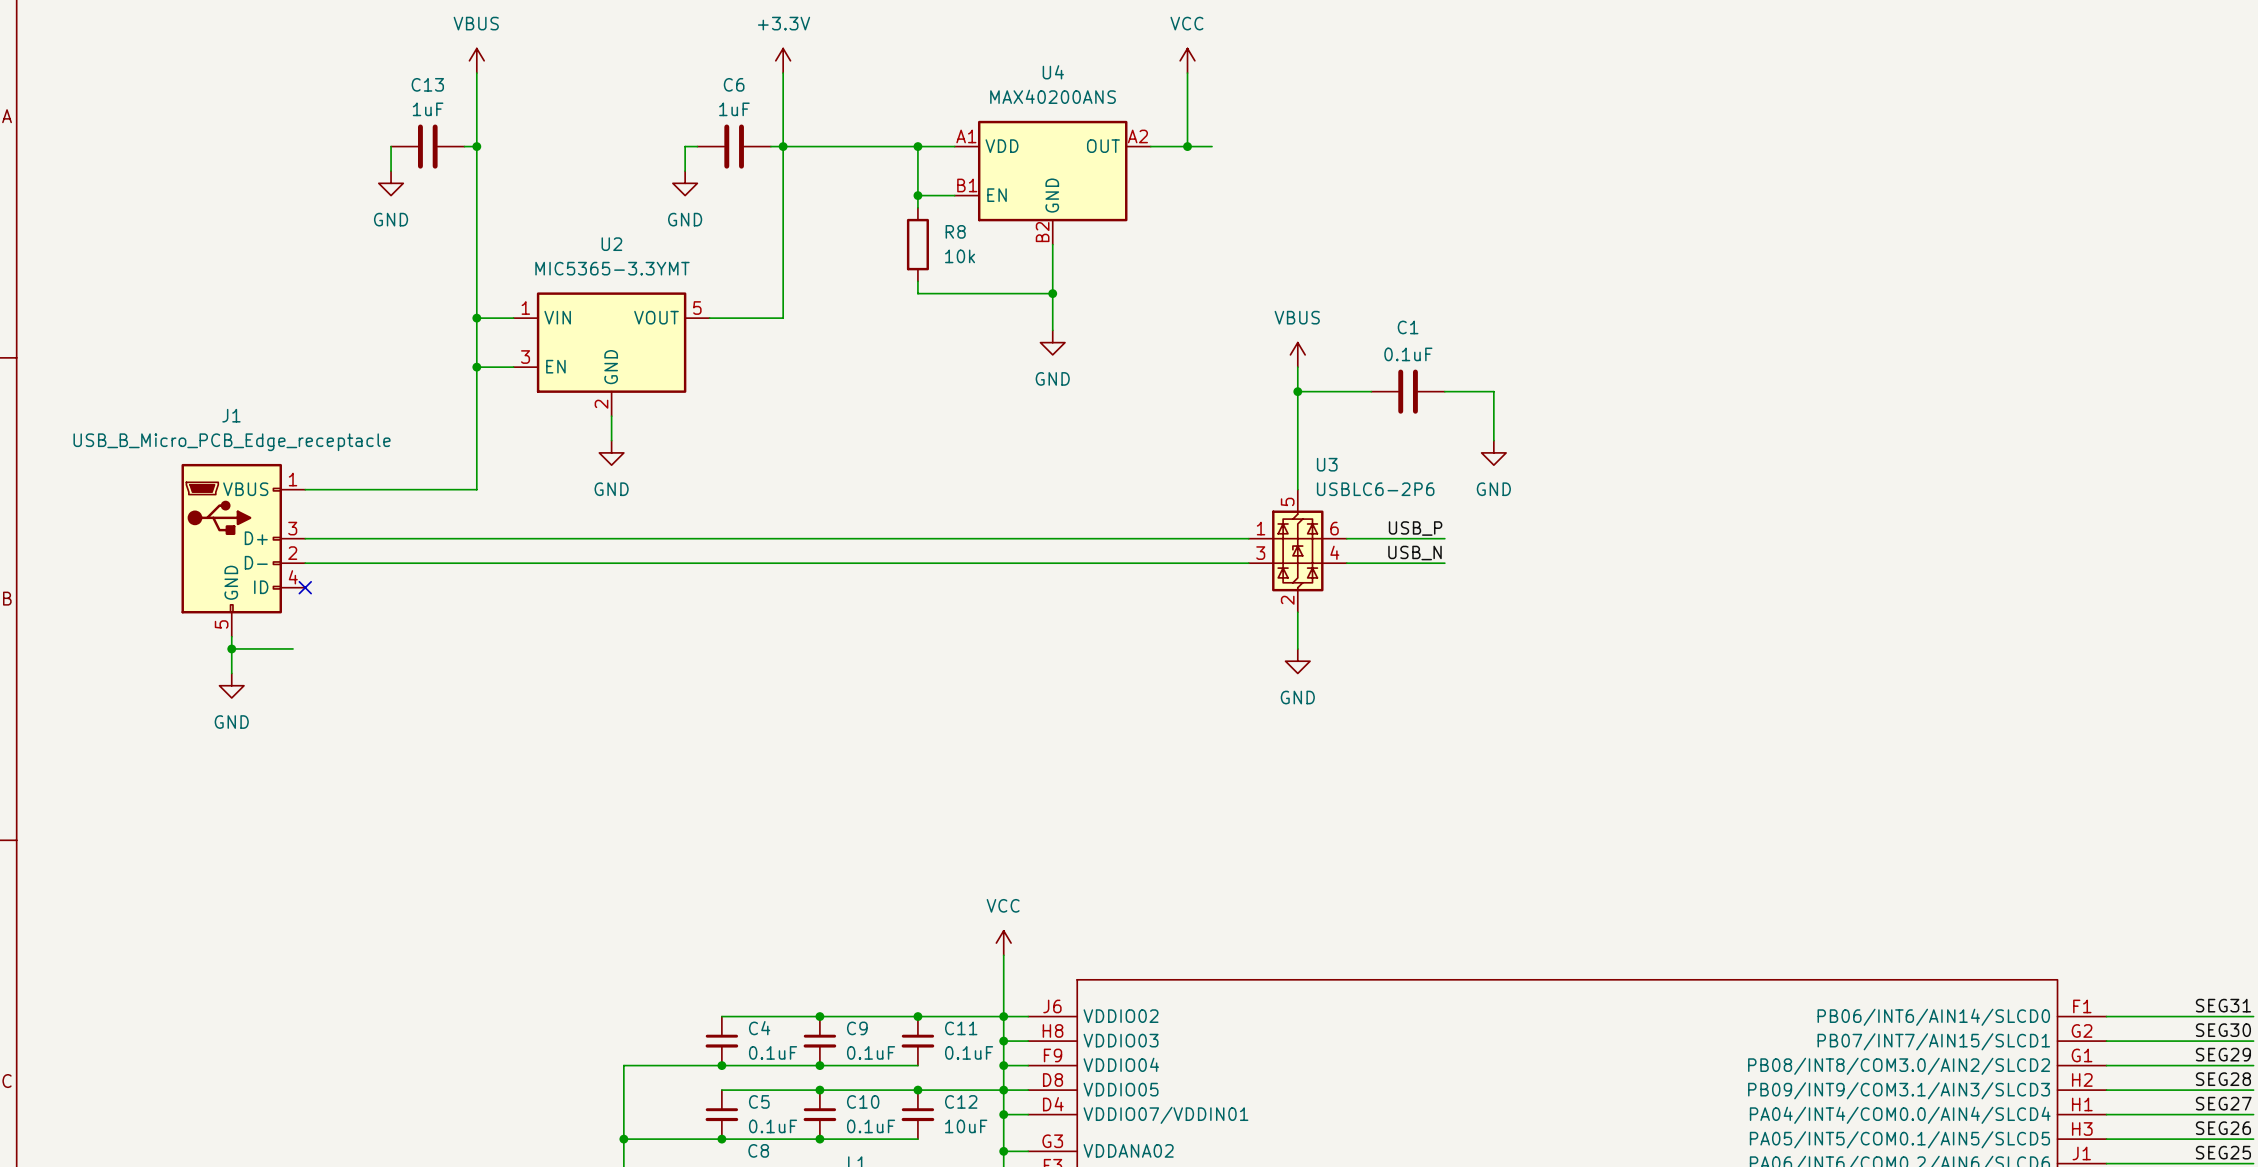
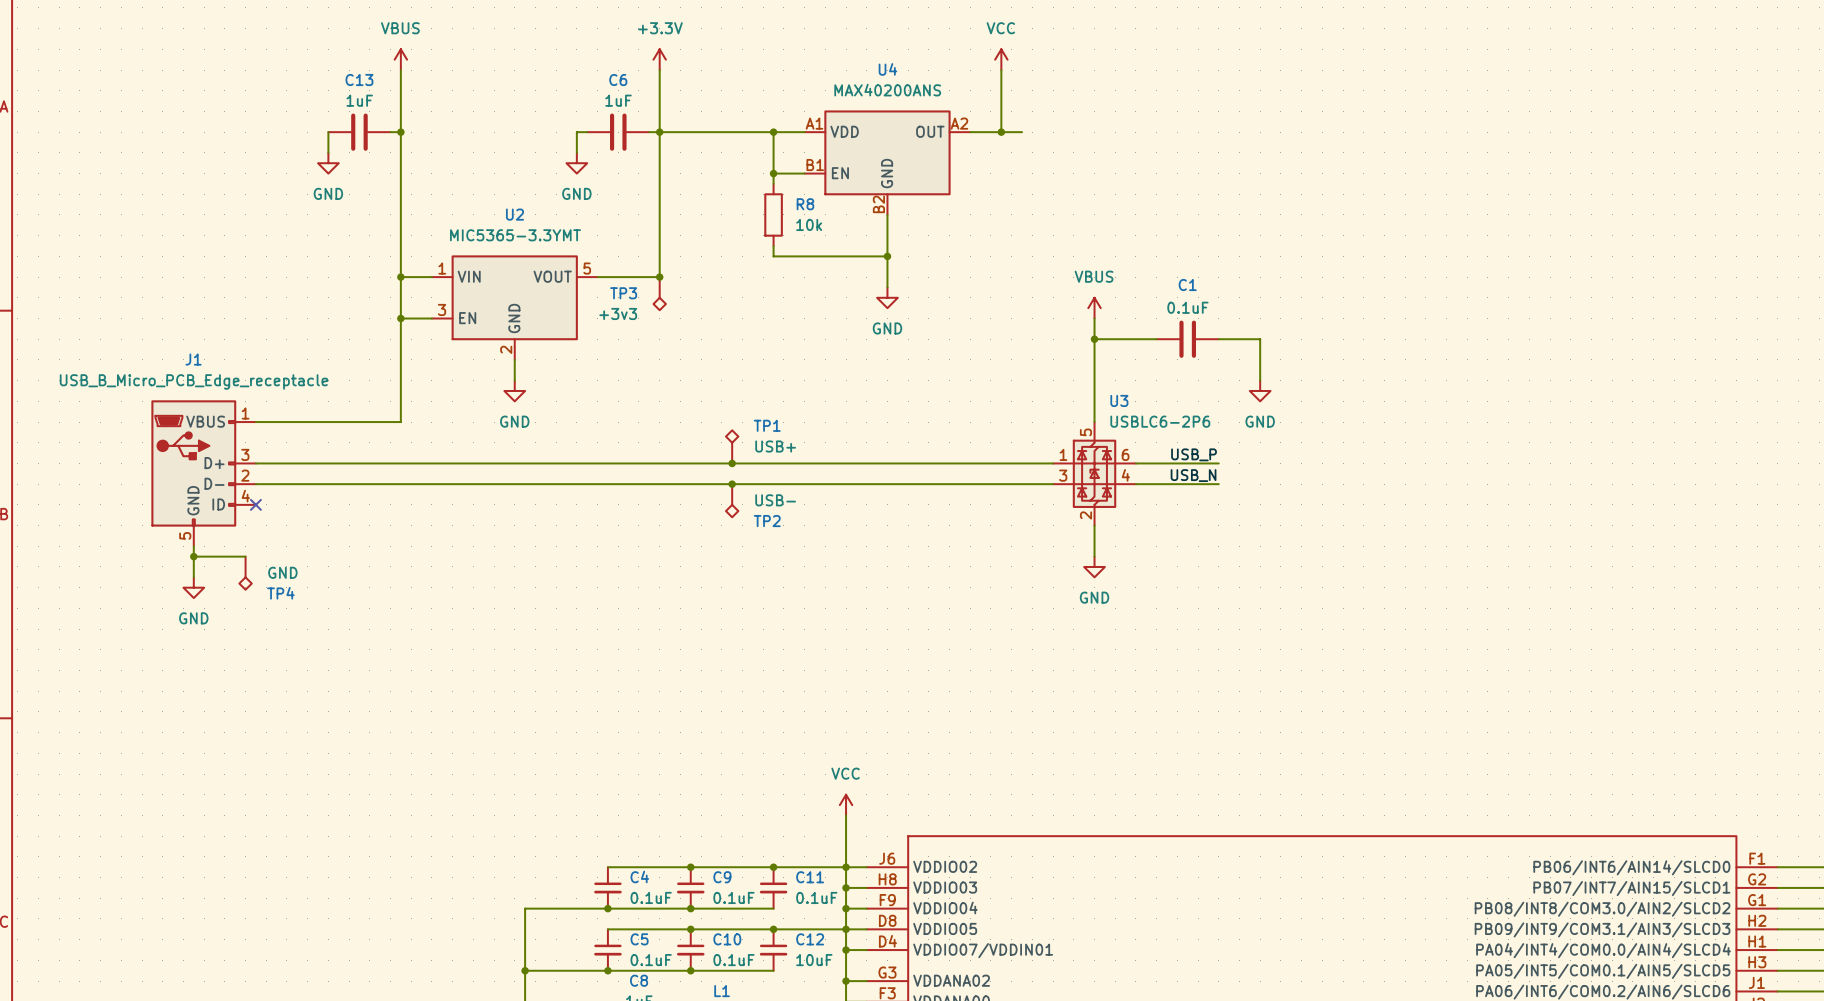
junction: none -> (659, 277)
TP3: none -> +3v3 (659, 293)
TP1: none -> USB+ (732, 446)
junction: none -> (732, 463)
junction: none -> (732, 484)
TP2: none -> USB- (732, 500)
TP4: none -> GND (245, 573)

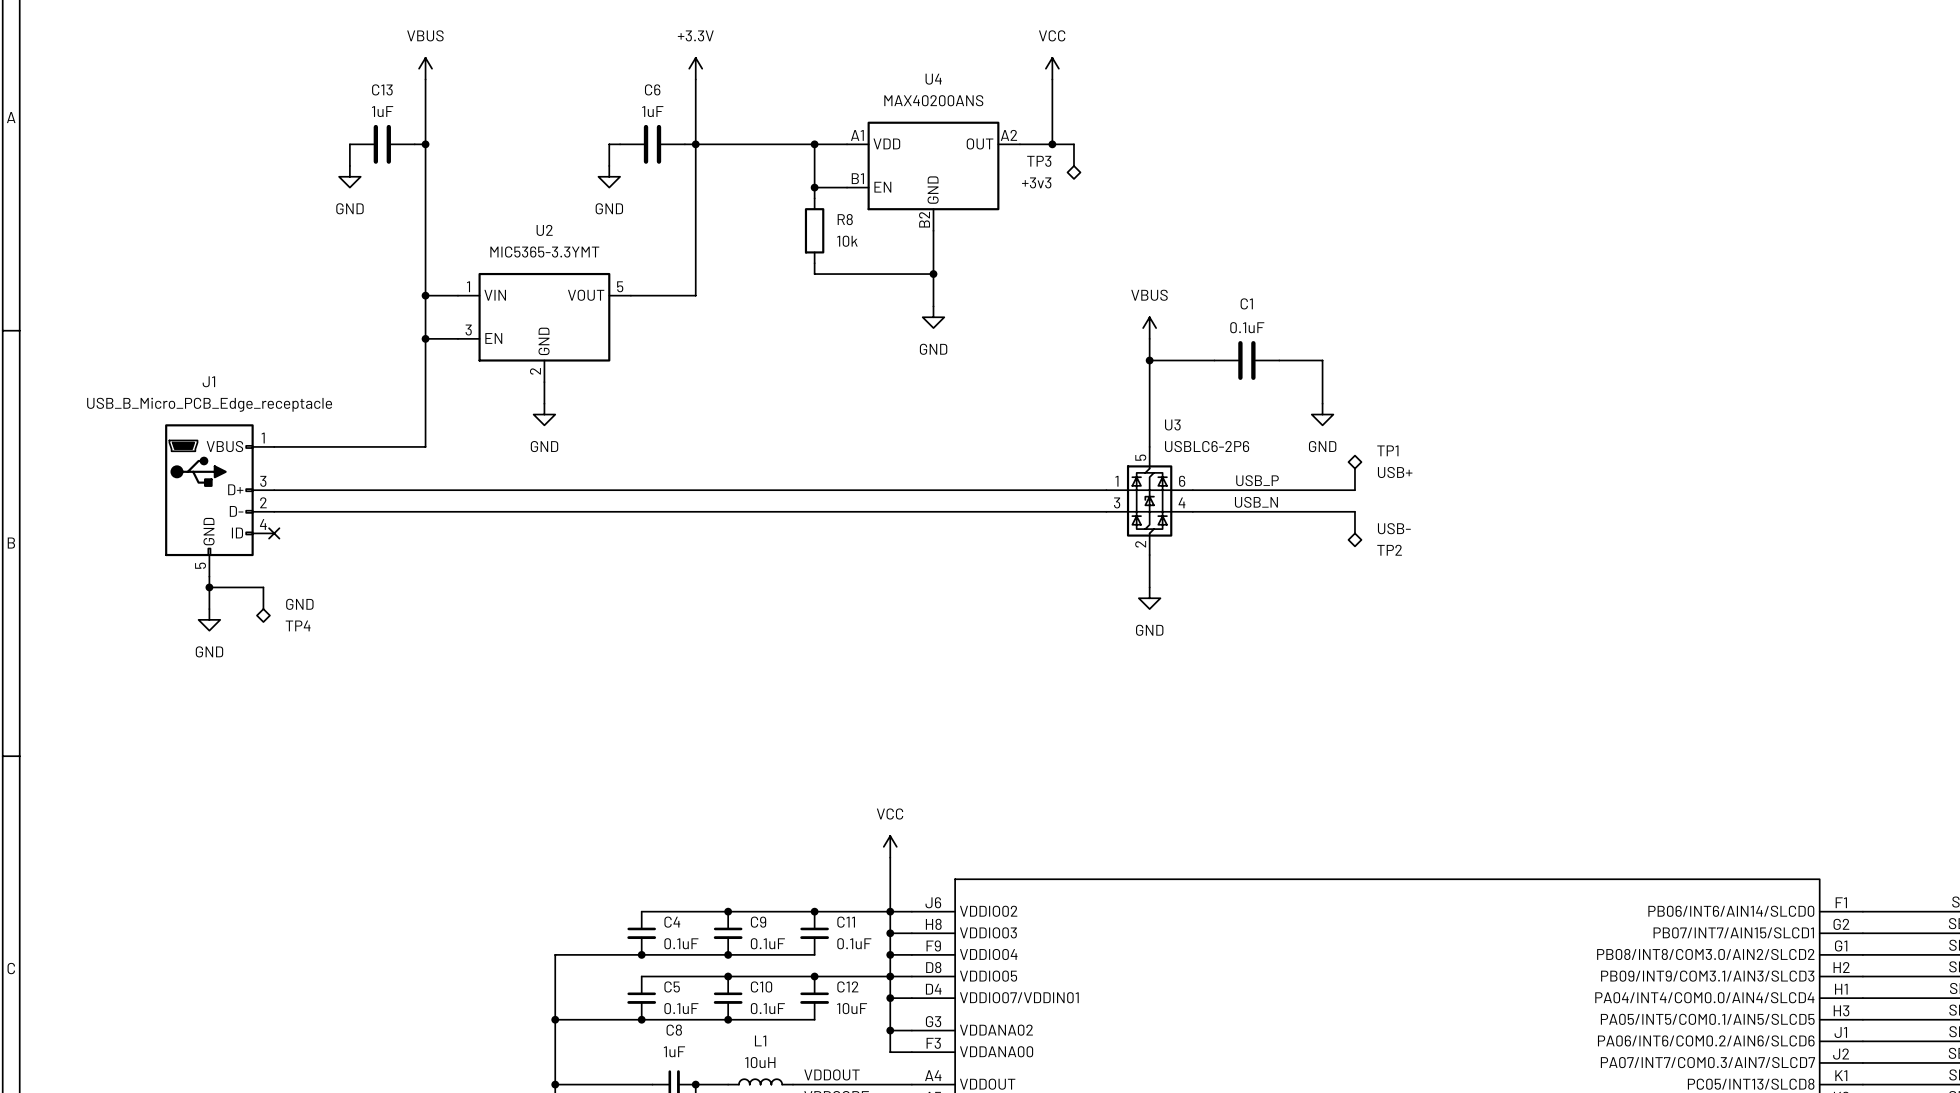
junction: (659, 277) -> none
TP3 position: (659, 293) -> (1073, 161)
TP1 position: (732, 446) -> (1354, 472)
junction: (732, 463) -> none
wire: none -> (1279, 490) (1354, 490)
junction: (732, 484) -> none
wire: none -> (1279, 511) (1354, 511)
TP2 position: (732, 500) -> (1354, 529)

